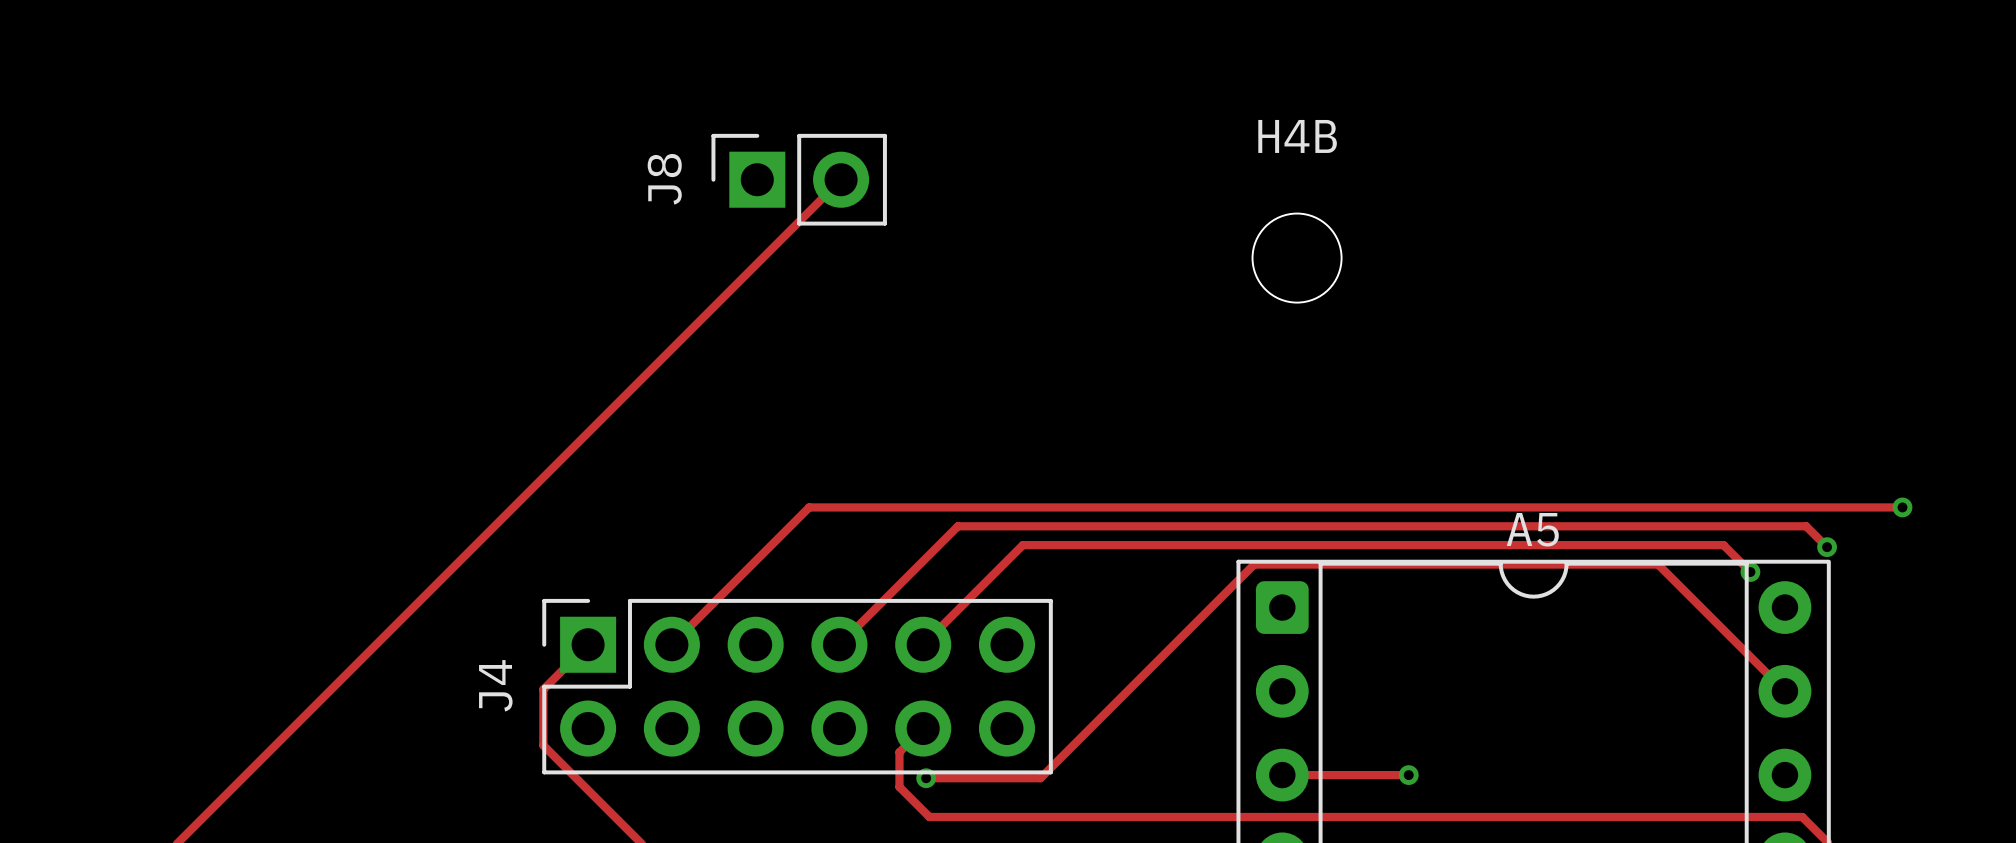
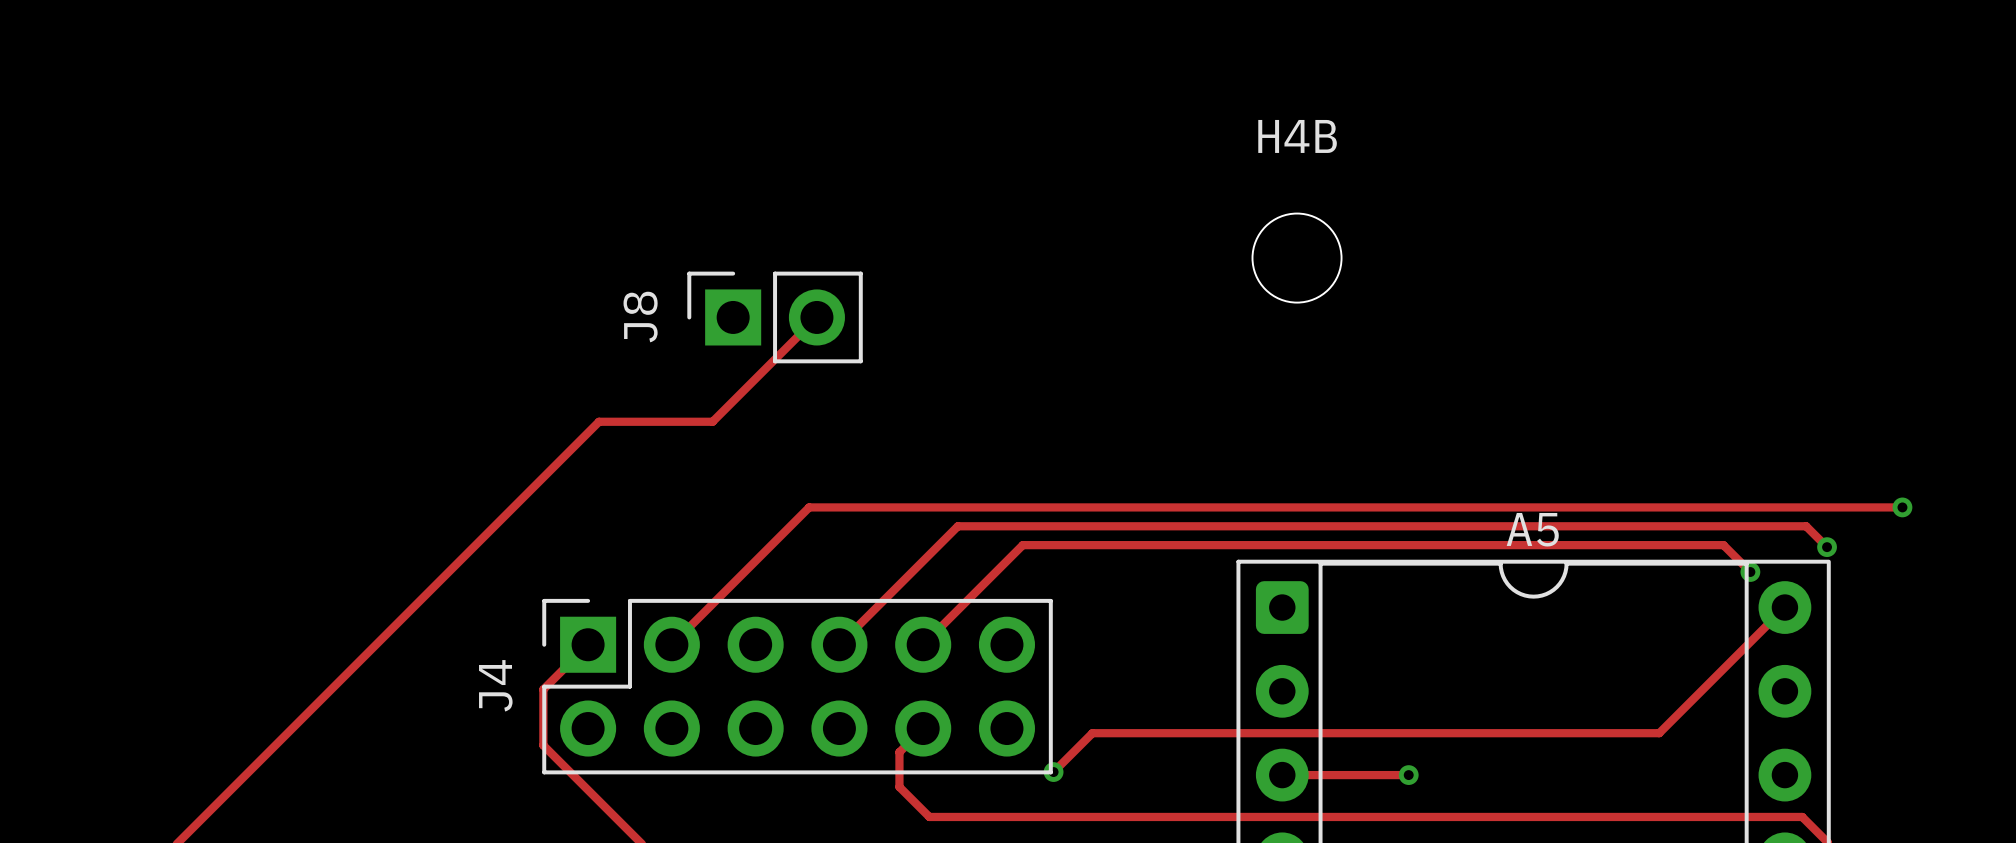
J8 position: (799, 179) -> (775, 317)
track: (841, 179) (599, 421) -> (816, 317) (712, 421) (599, 421)
track: none -> (1784, 607) (1659, 733) (1092, 733) (1053, 772)
track: (1784, 691) (1658, 564) (1254, 564) (1040, 778) (926, 778) -> none
via position: (926, 778) -> (1053, 772)

